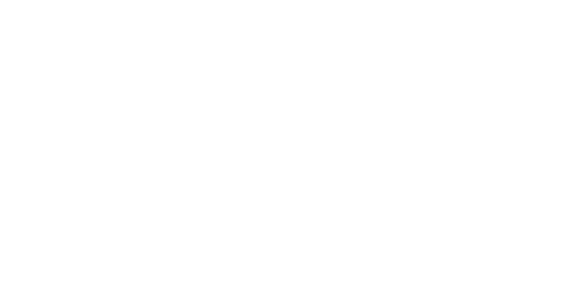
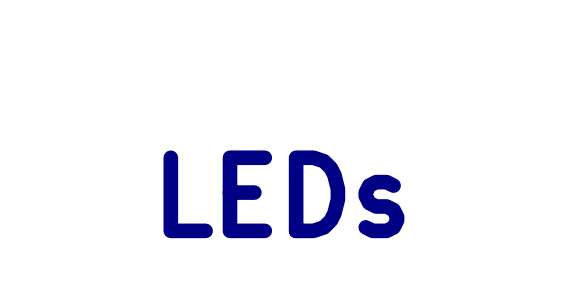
text: none -> LEDs (283, 194)

